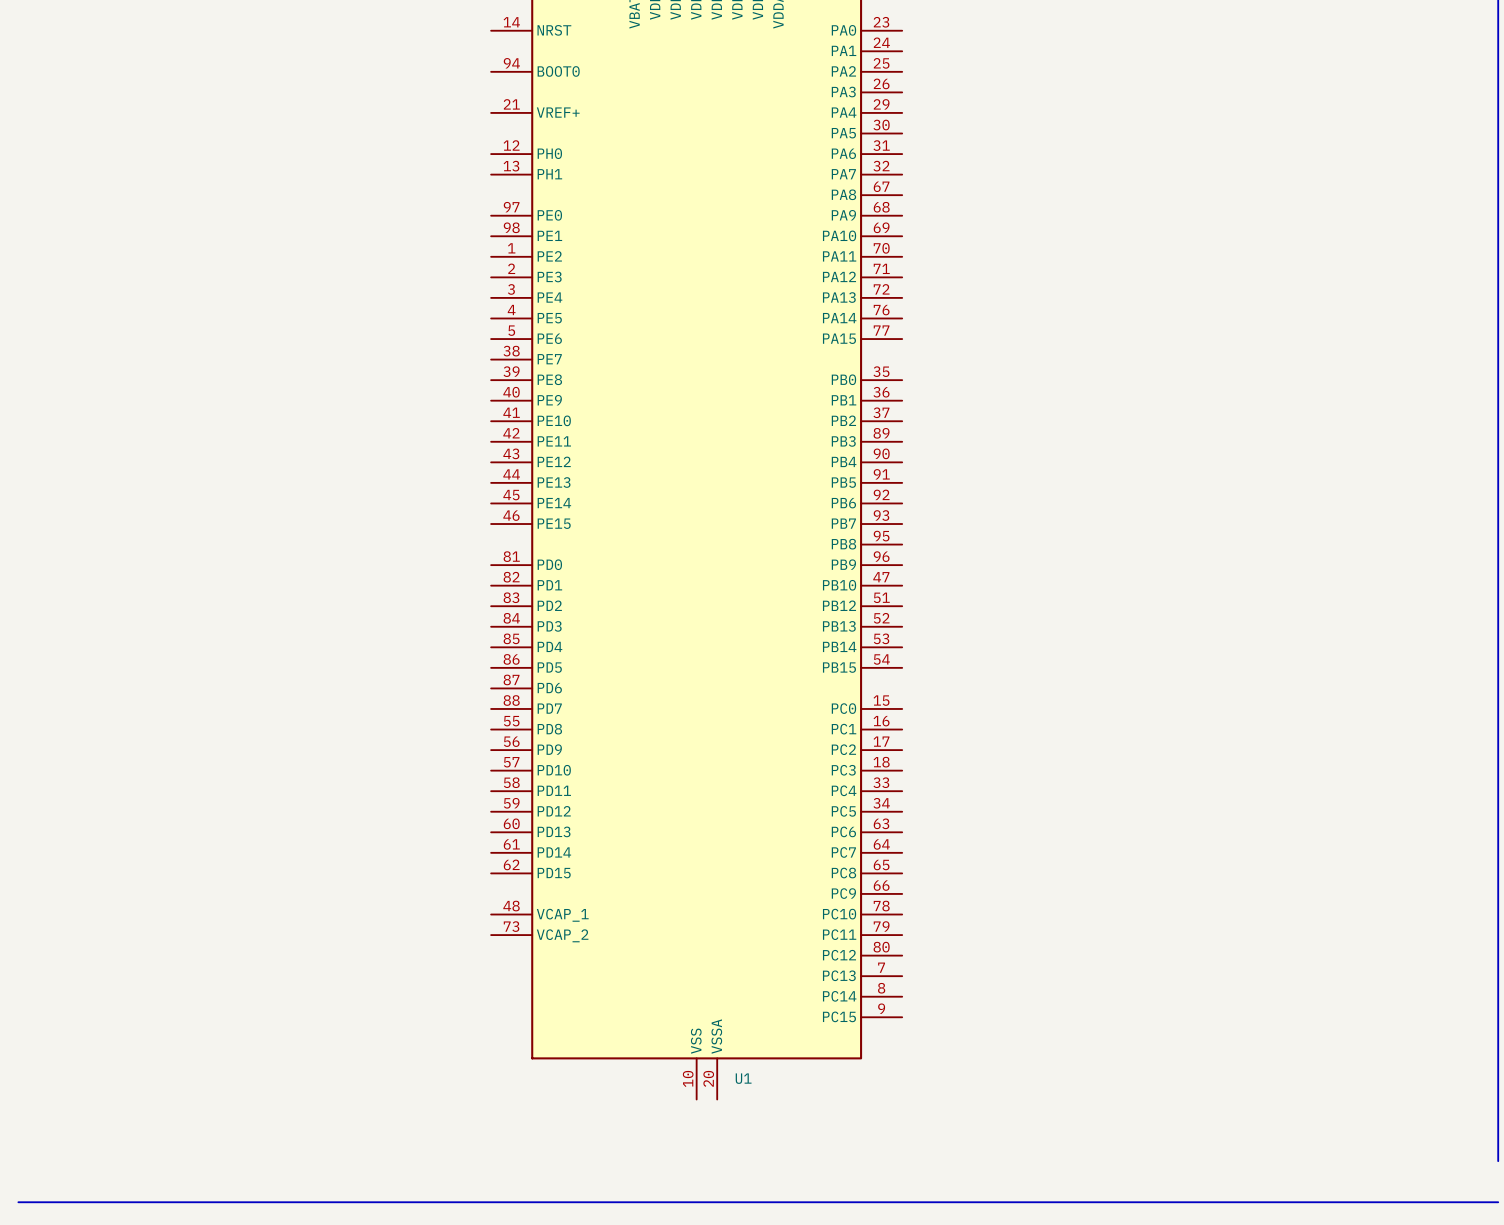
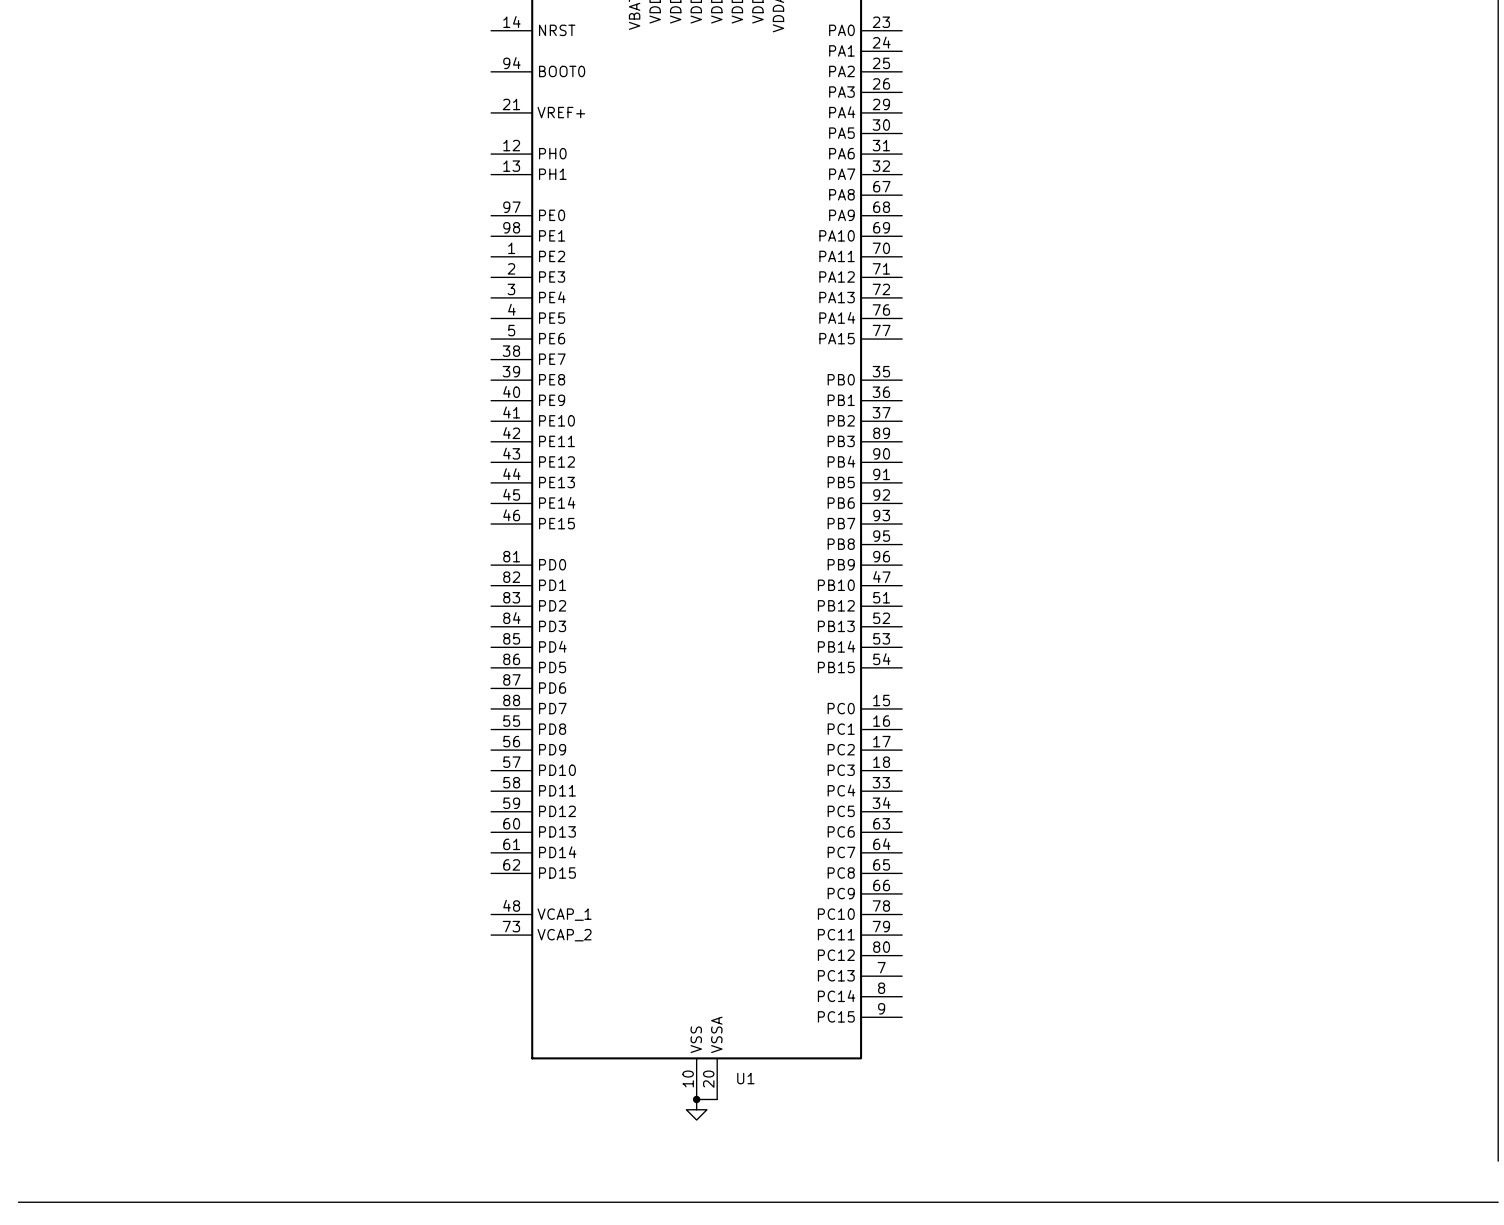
wire: none -> (696, 1099) (717, 1099)
junction: none -> (696, 1099)
power symbol: none -> (696, 1109)

